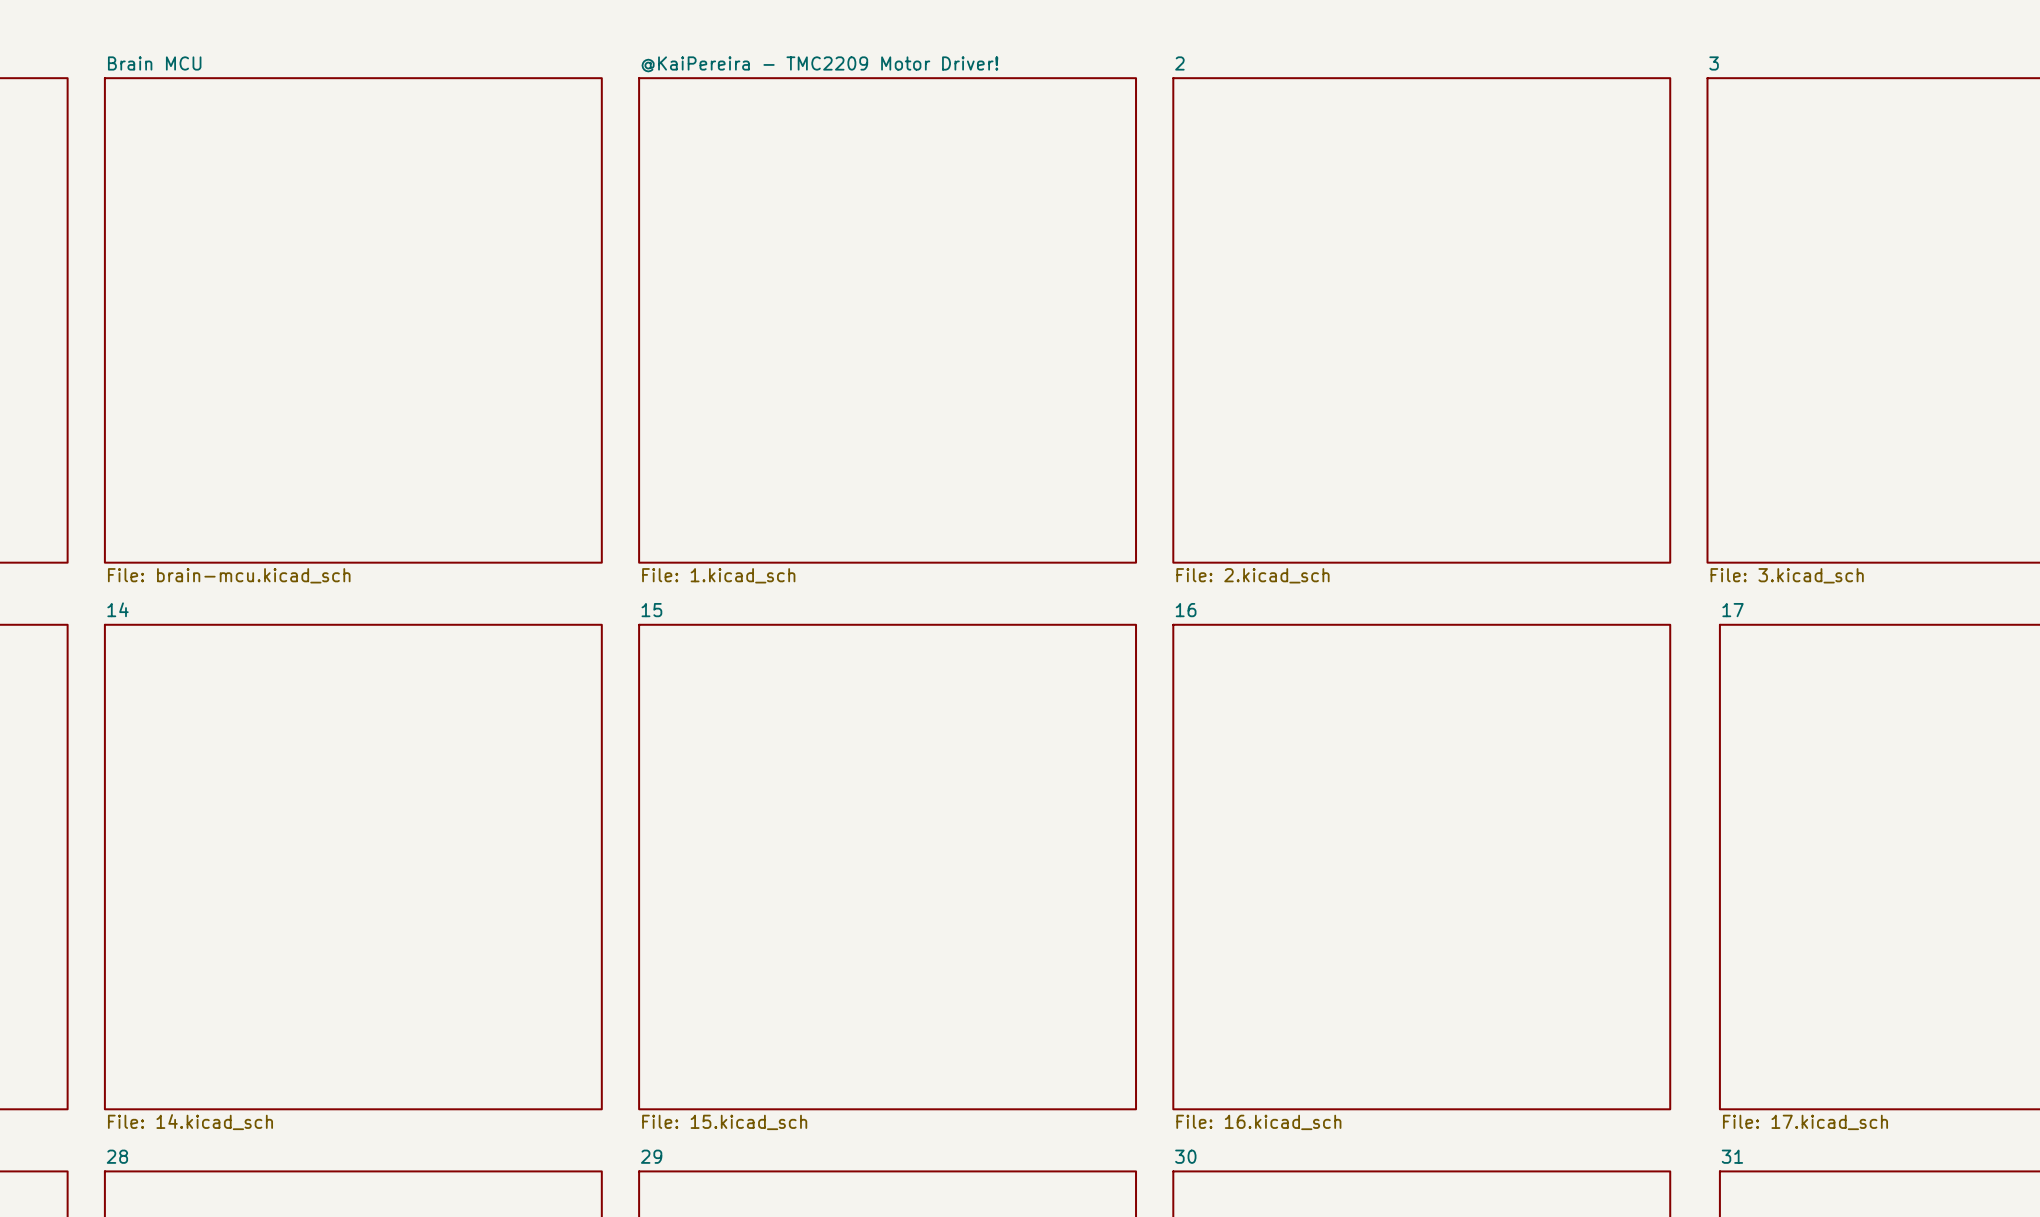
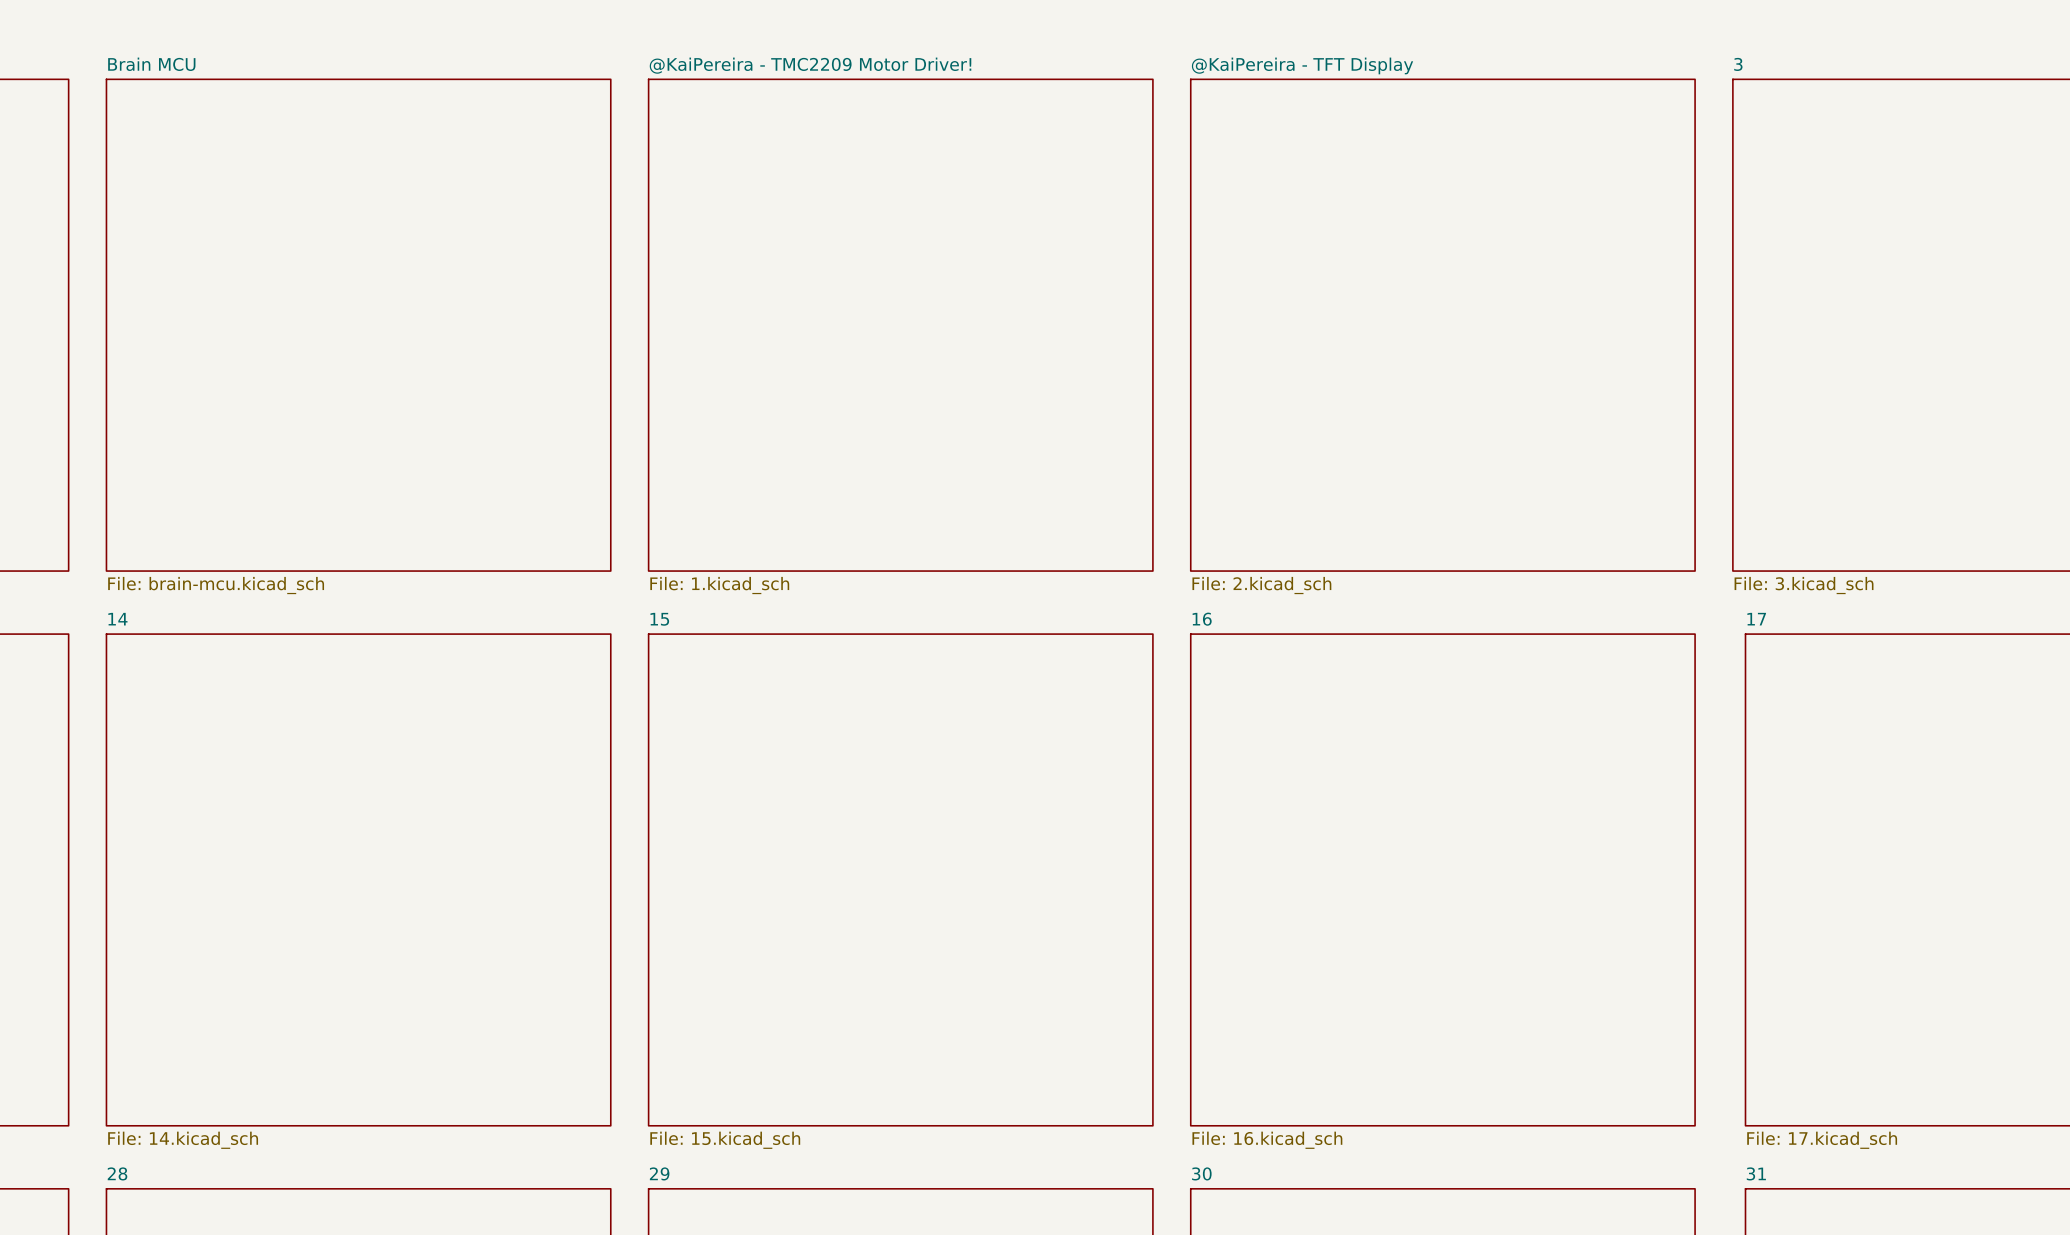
sheet 2 name: 2 (1179, 63) -> @KaiPereira - TFT Display (1302, 65)

